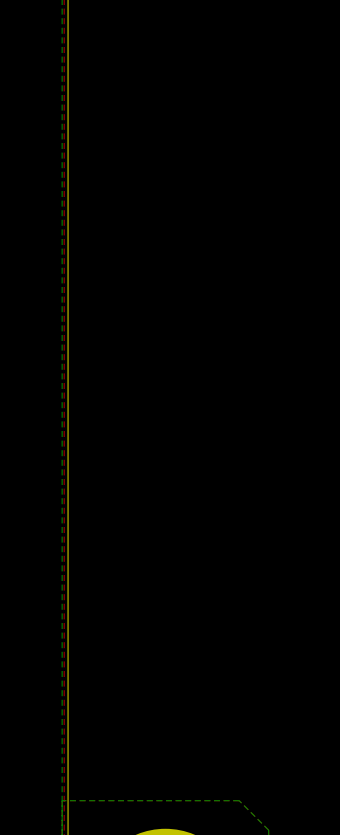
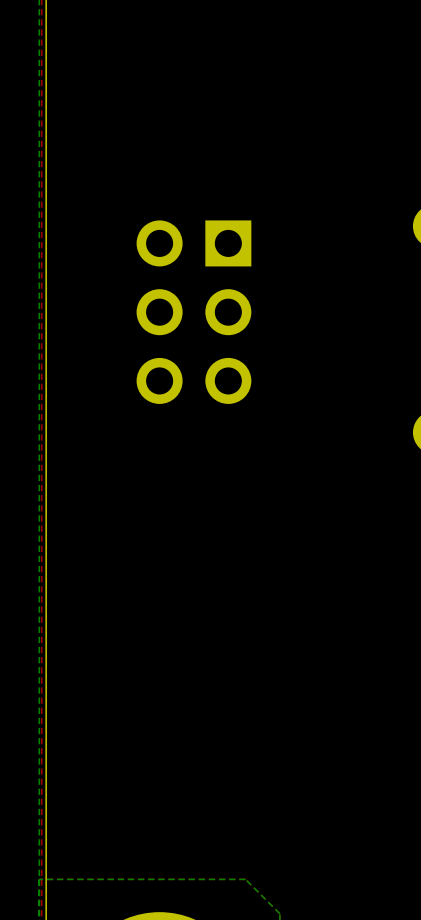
part: none -> (193, 312)

